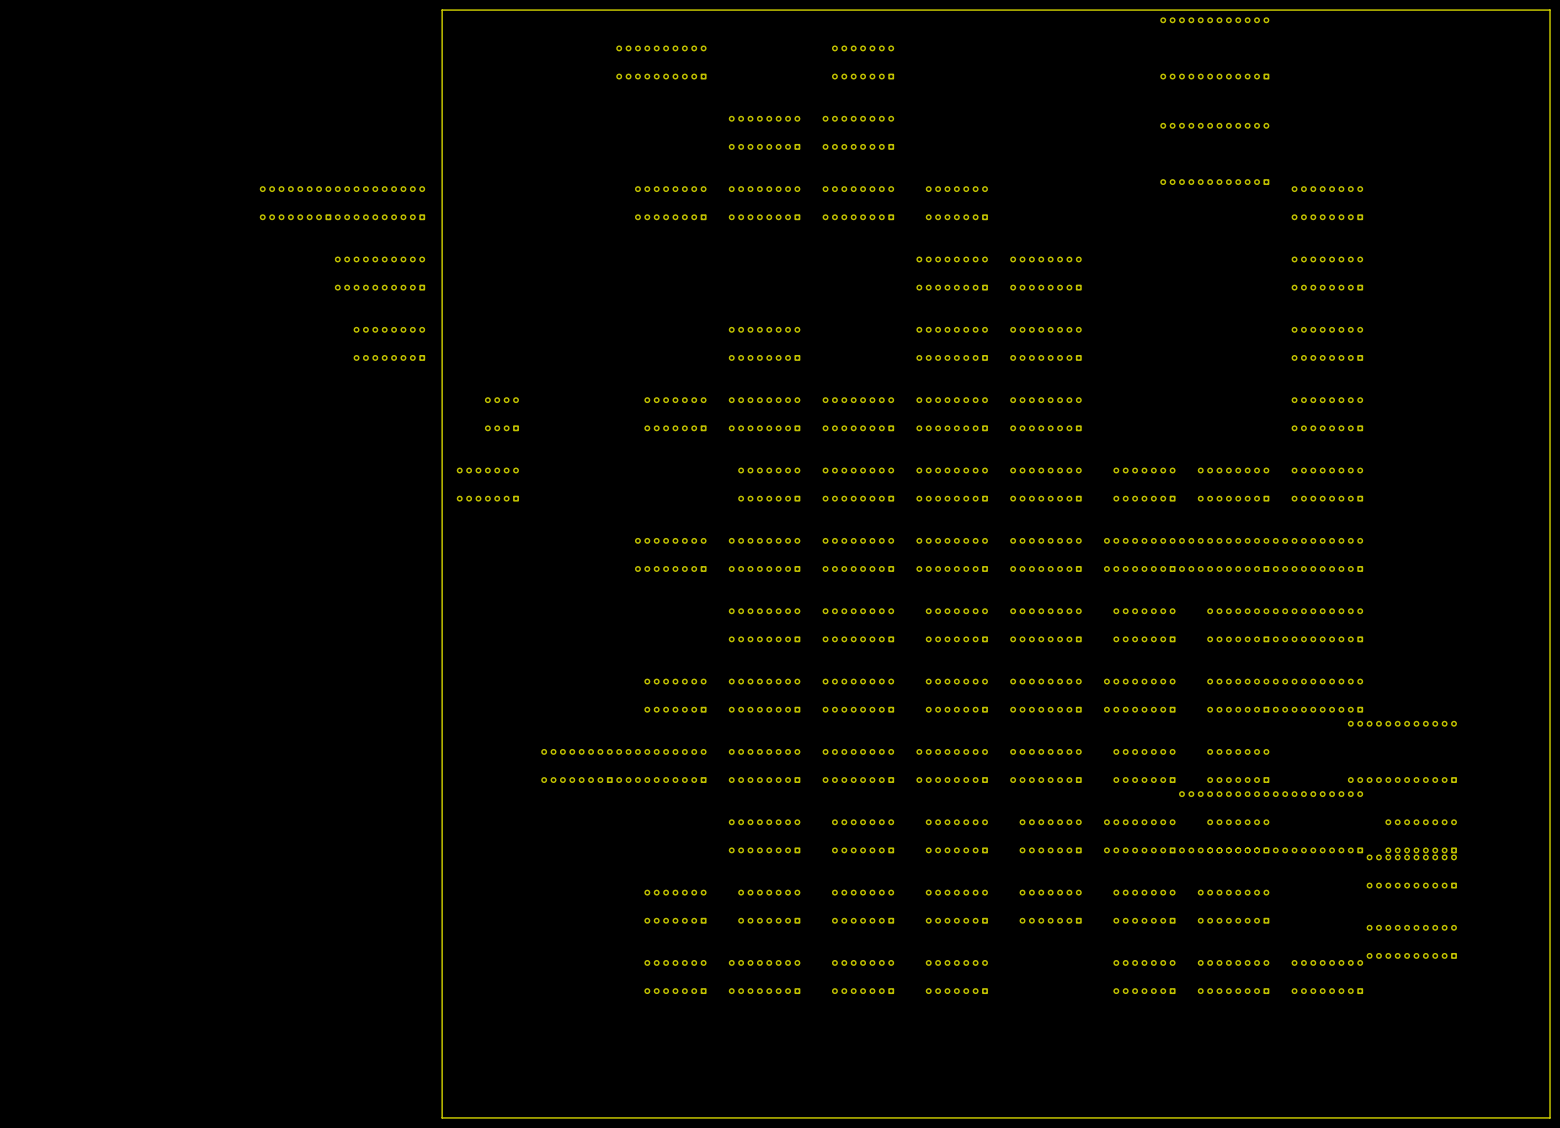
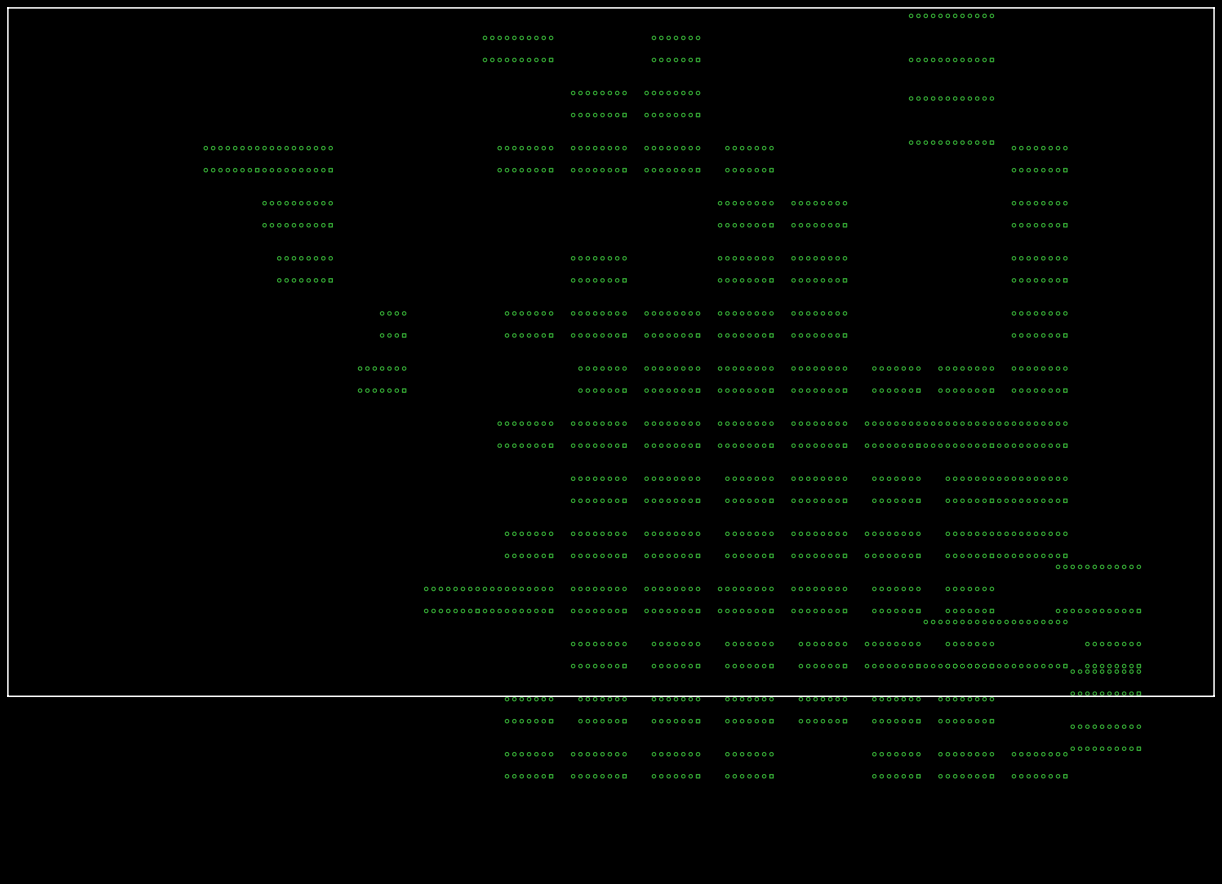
board edge: (442, 10) (442, 1117) (1550, 1117) (1550, 888) -> (346, 7) (7, 7) (7, 696) (1214, 696)

